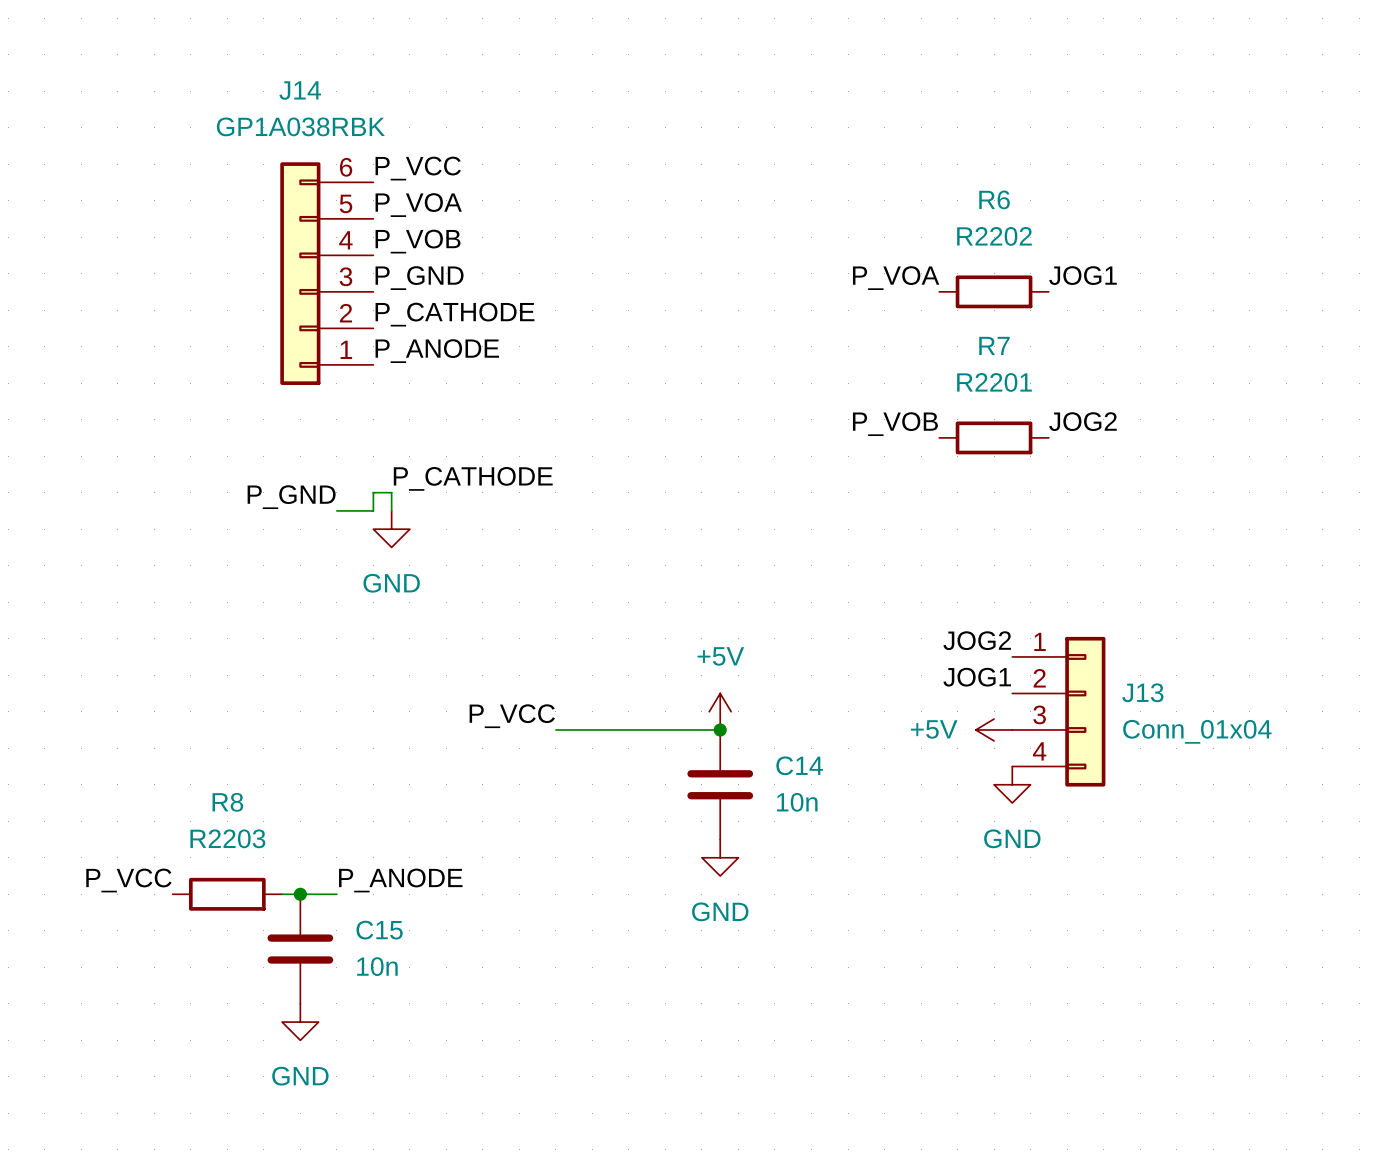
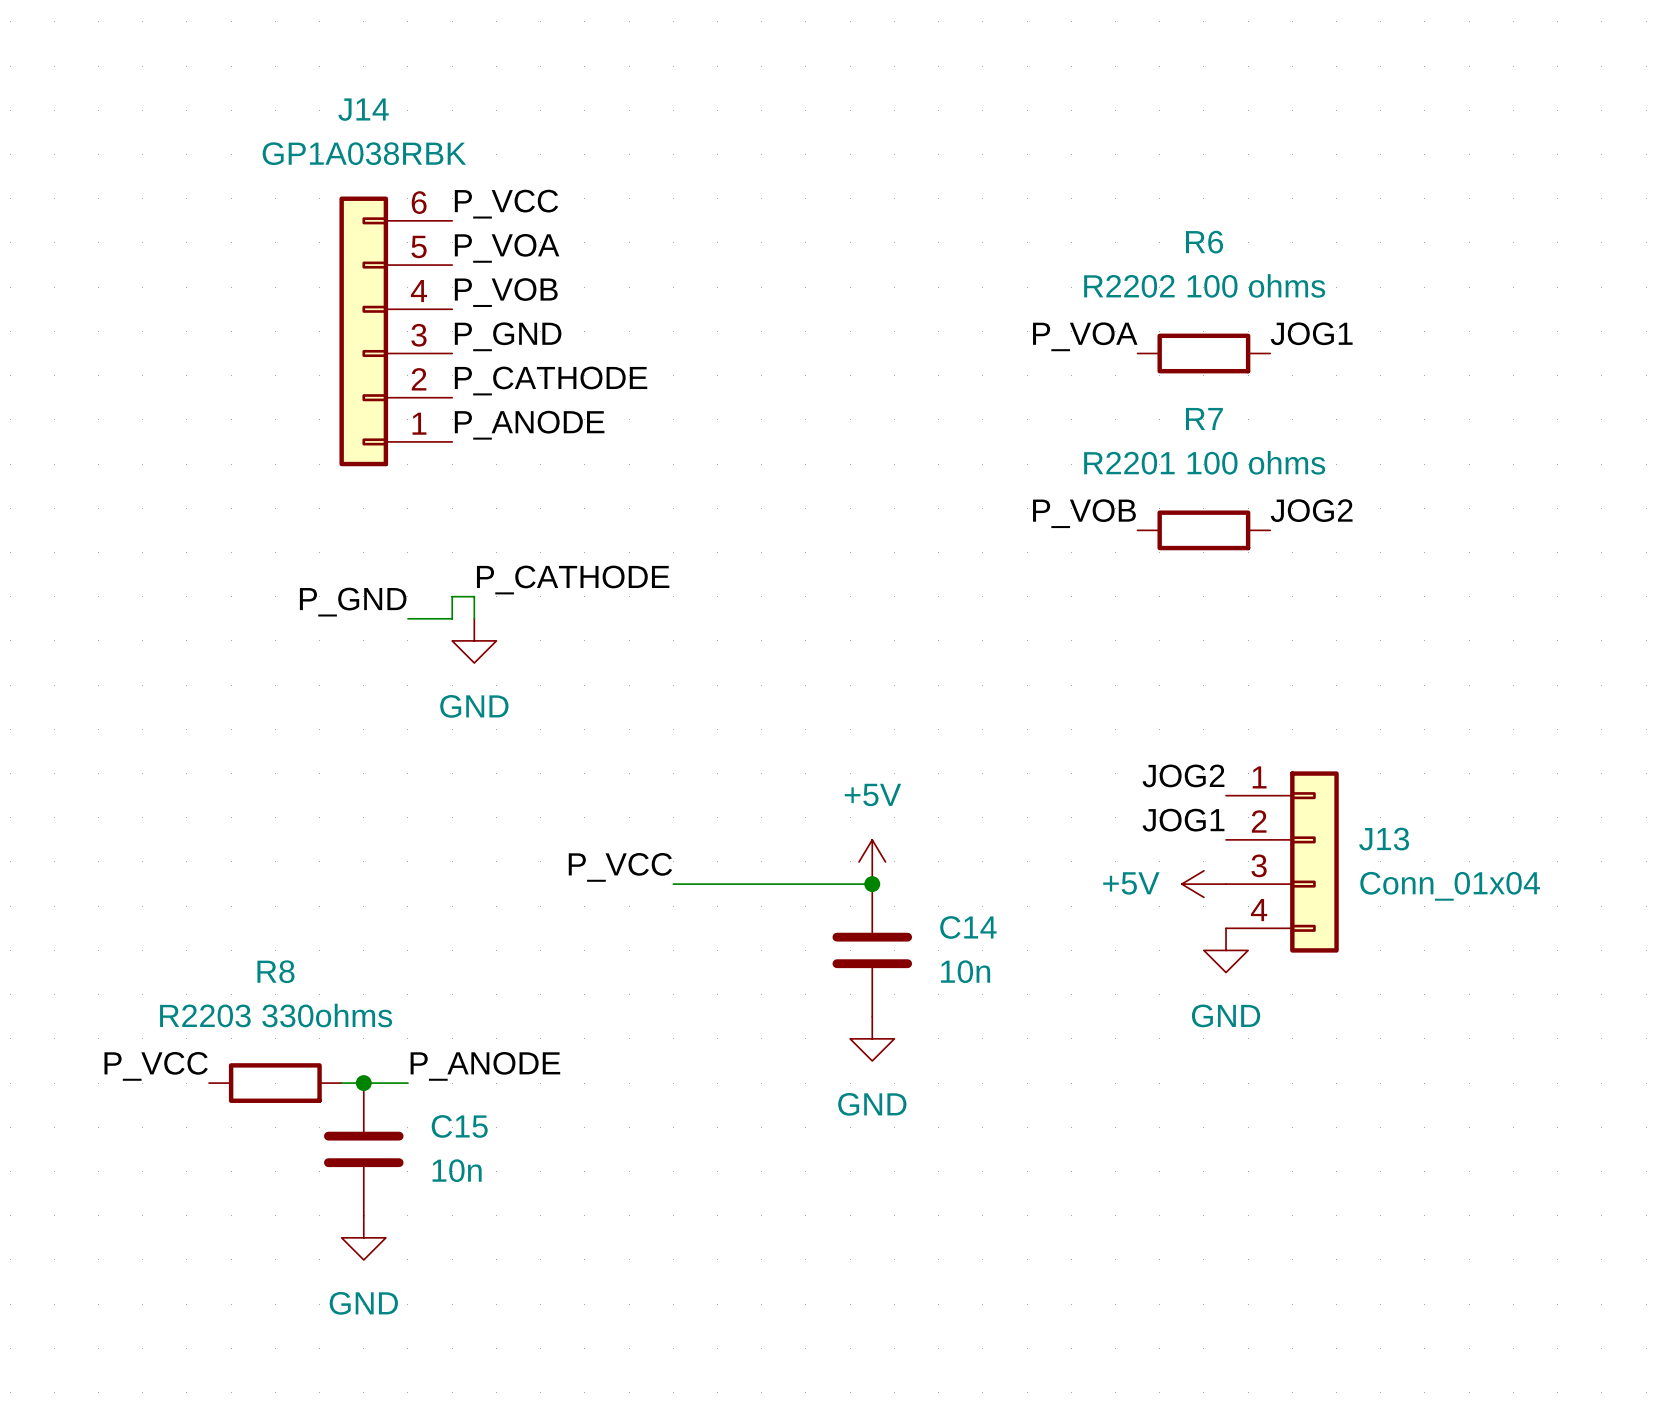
R6 value: R2202 (994, 236) -> R2202 100 ohms (1204, 285)
R7 value: R2201 (994, 382) -> R2201 100 ohms (1204, 462)
R8 value: R2203 (227, 838) -> R2203 330ohms (276, 1015)

